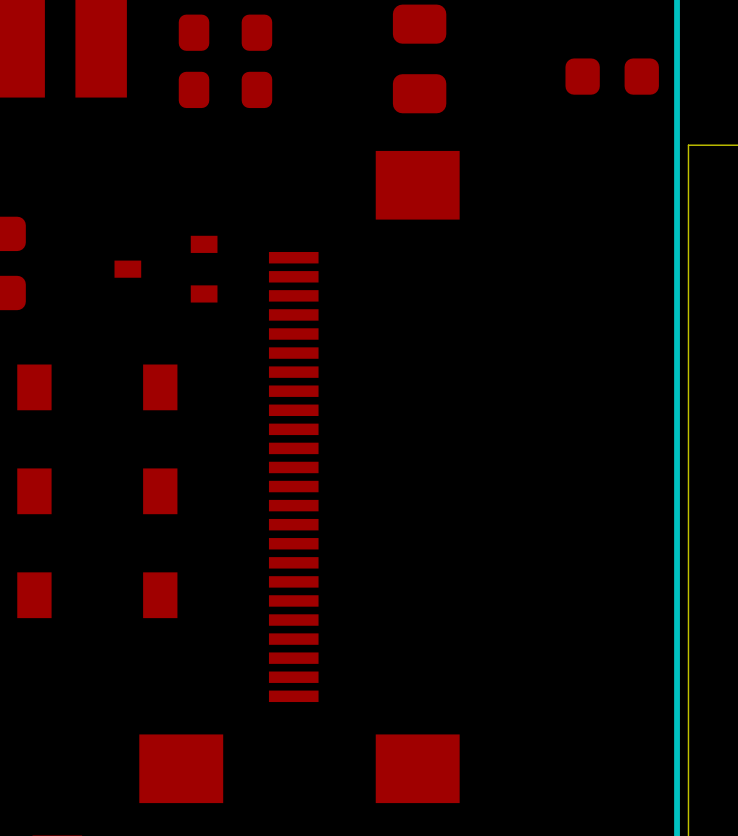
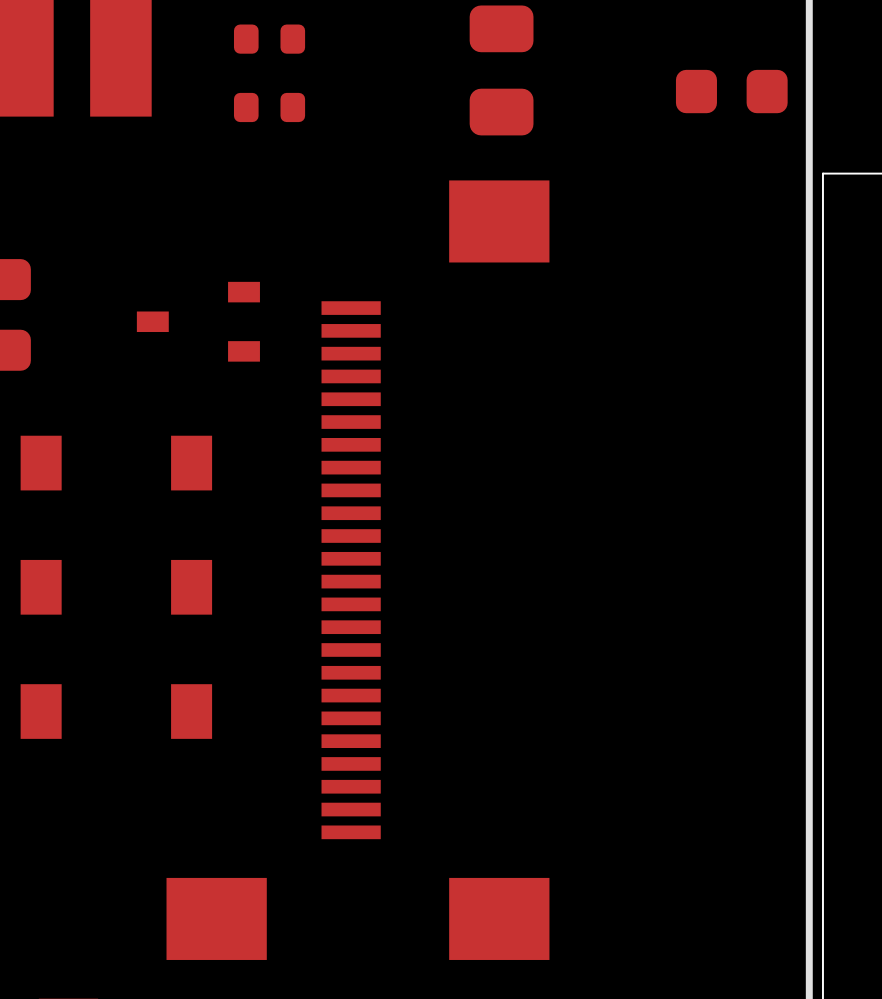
part footprint: [178, 14, 273, 51] -> [233, 24, 306, 54]
part footprint: [178, 71, 273, 109] -> [233, 92, 306, 123]

